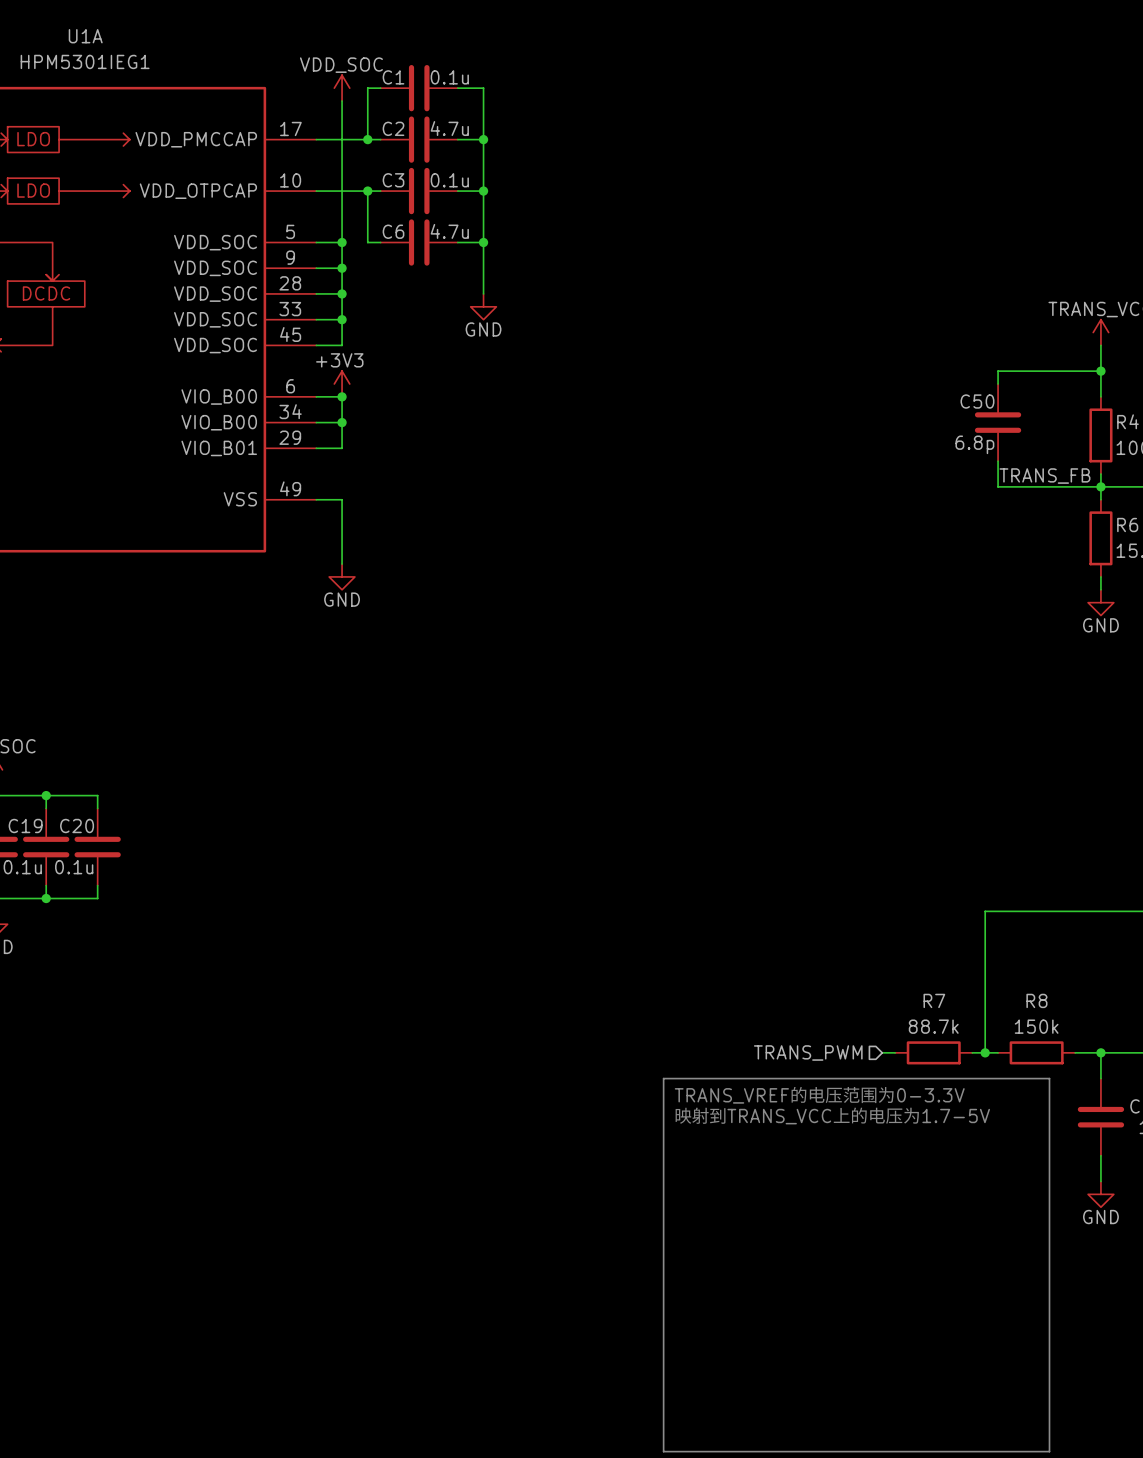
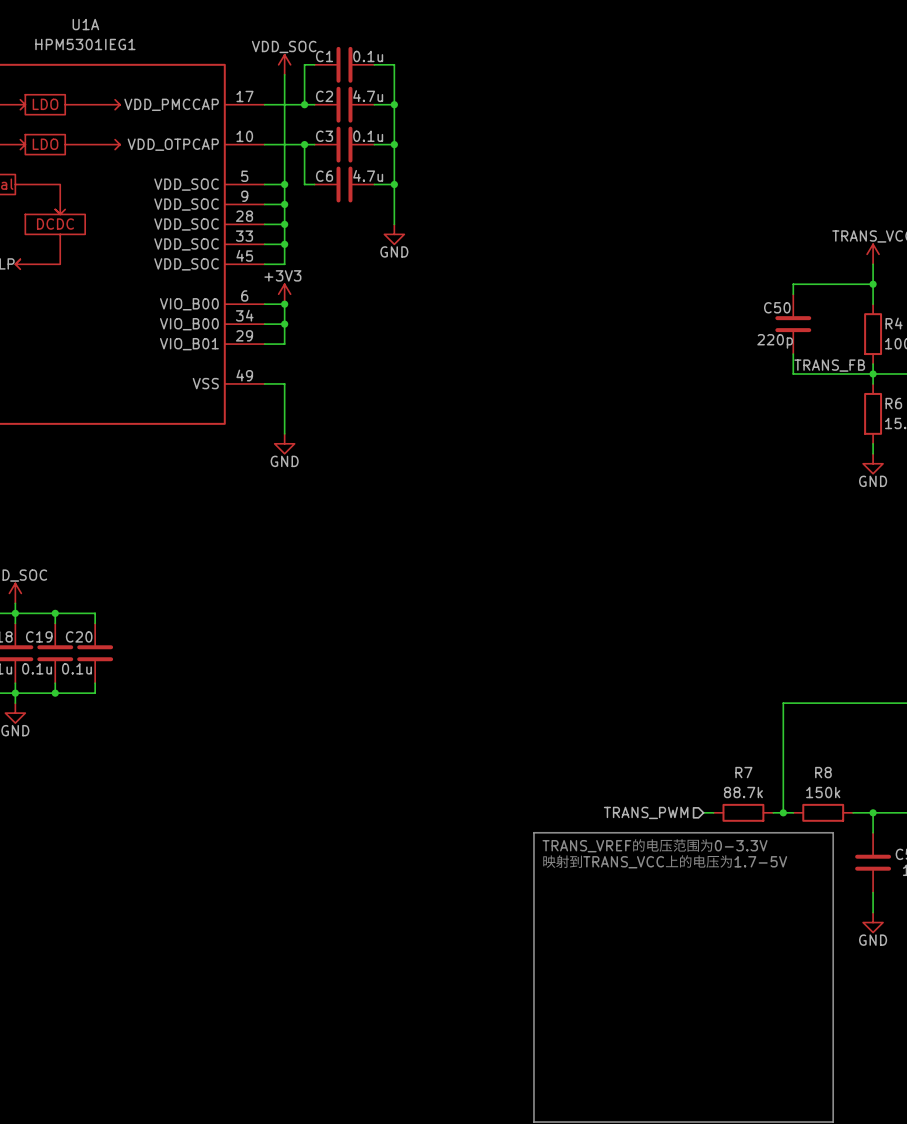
C50 value: 6.8p (974, 444) -> 220p (775, 341)

